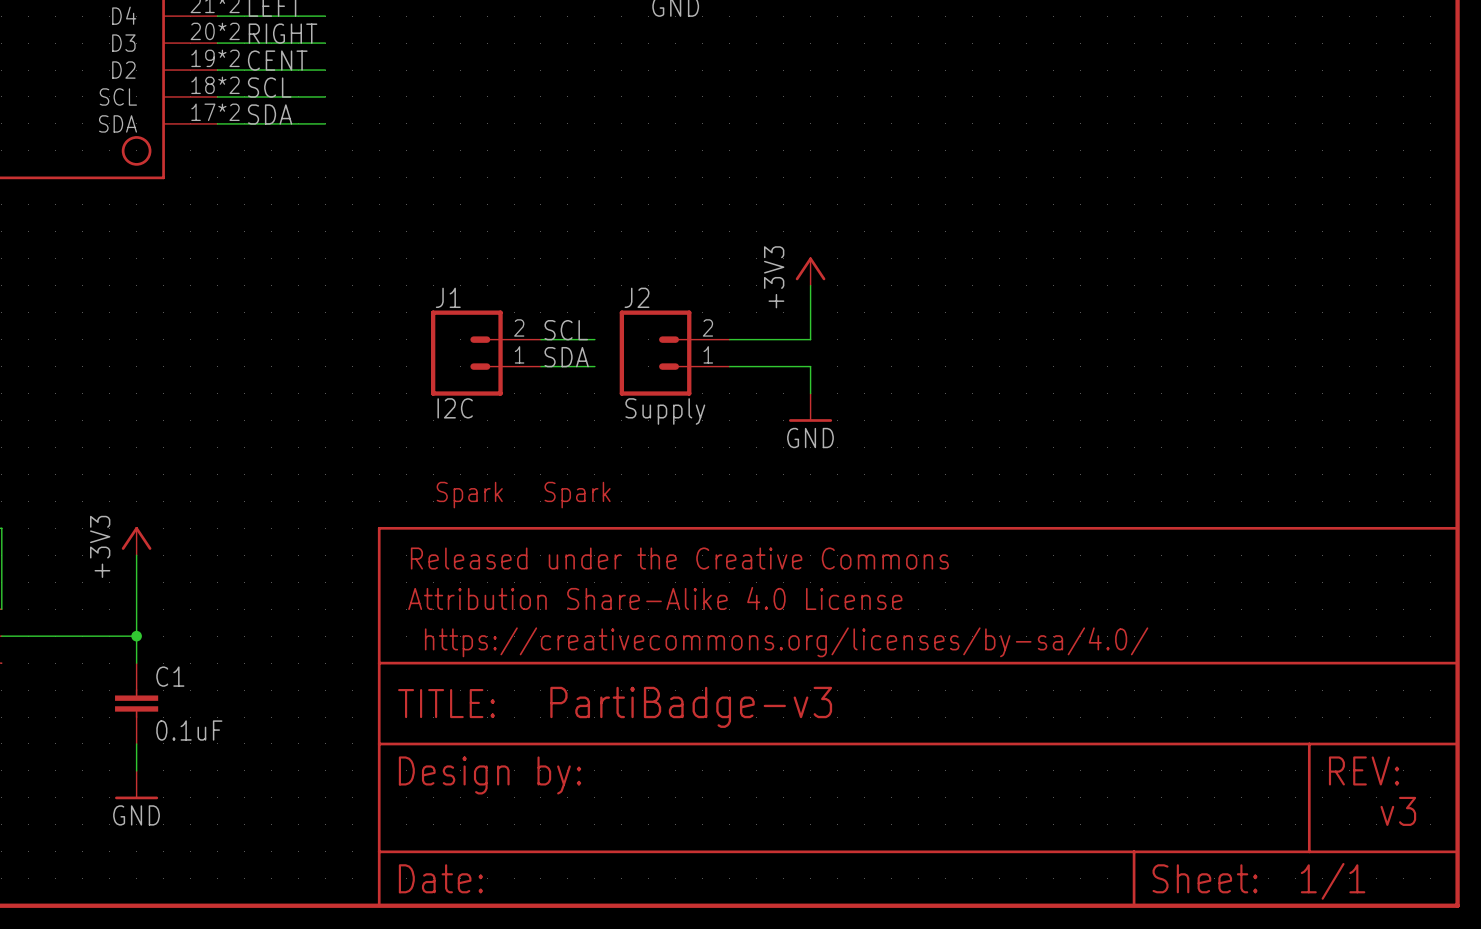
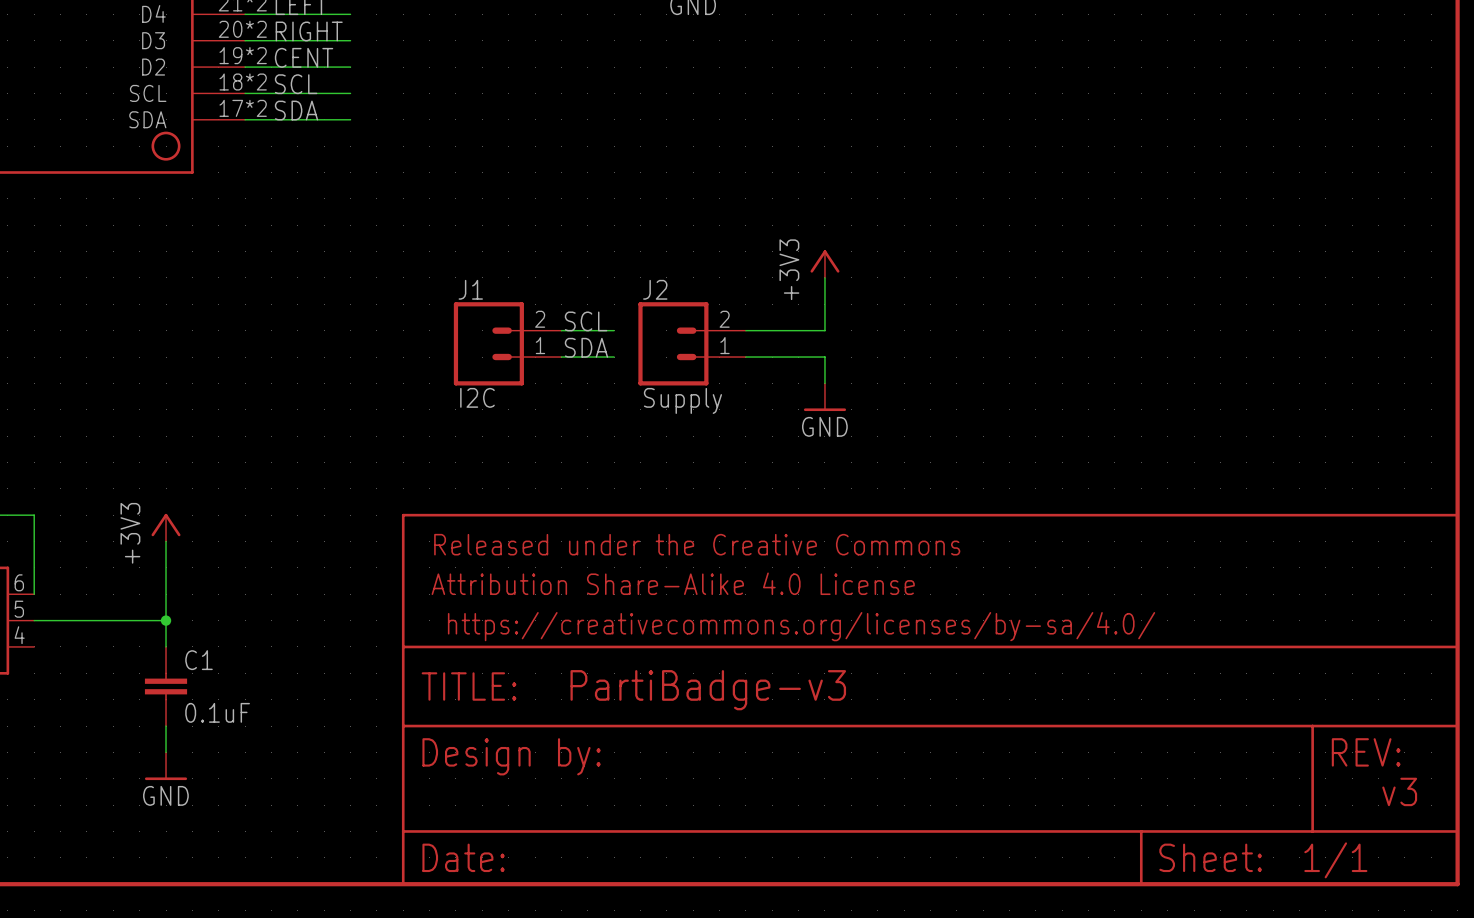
part: (469, 495) -> none
part: (577, 495) -> none

